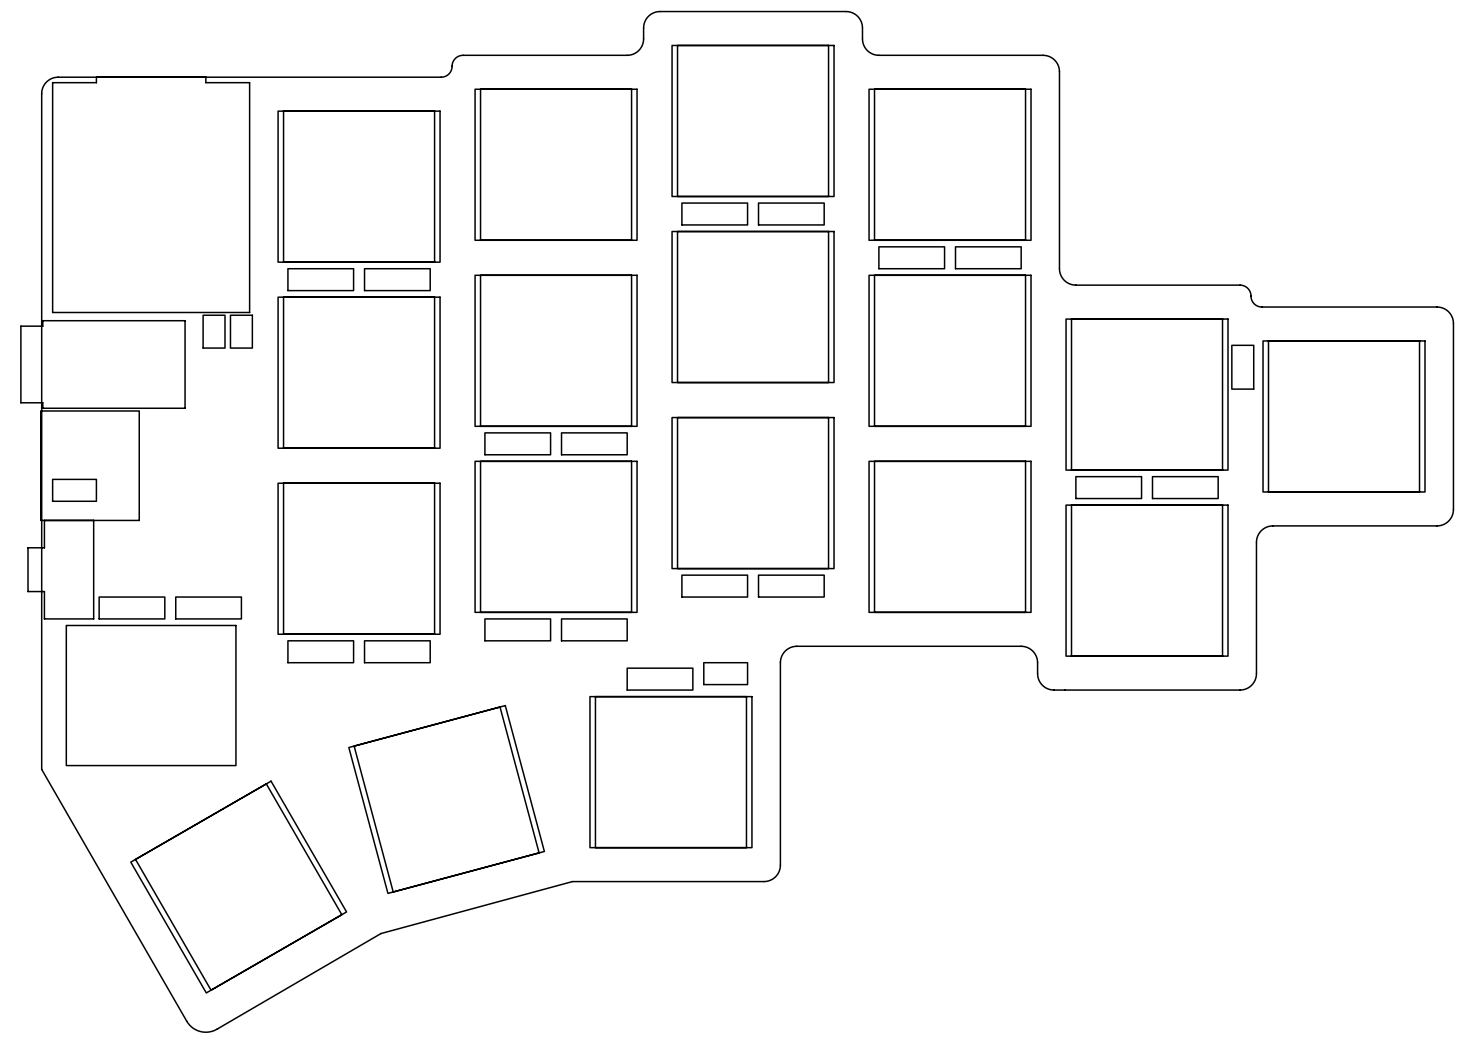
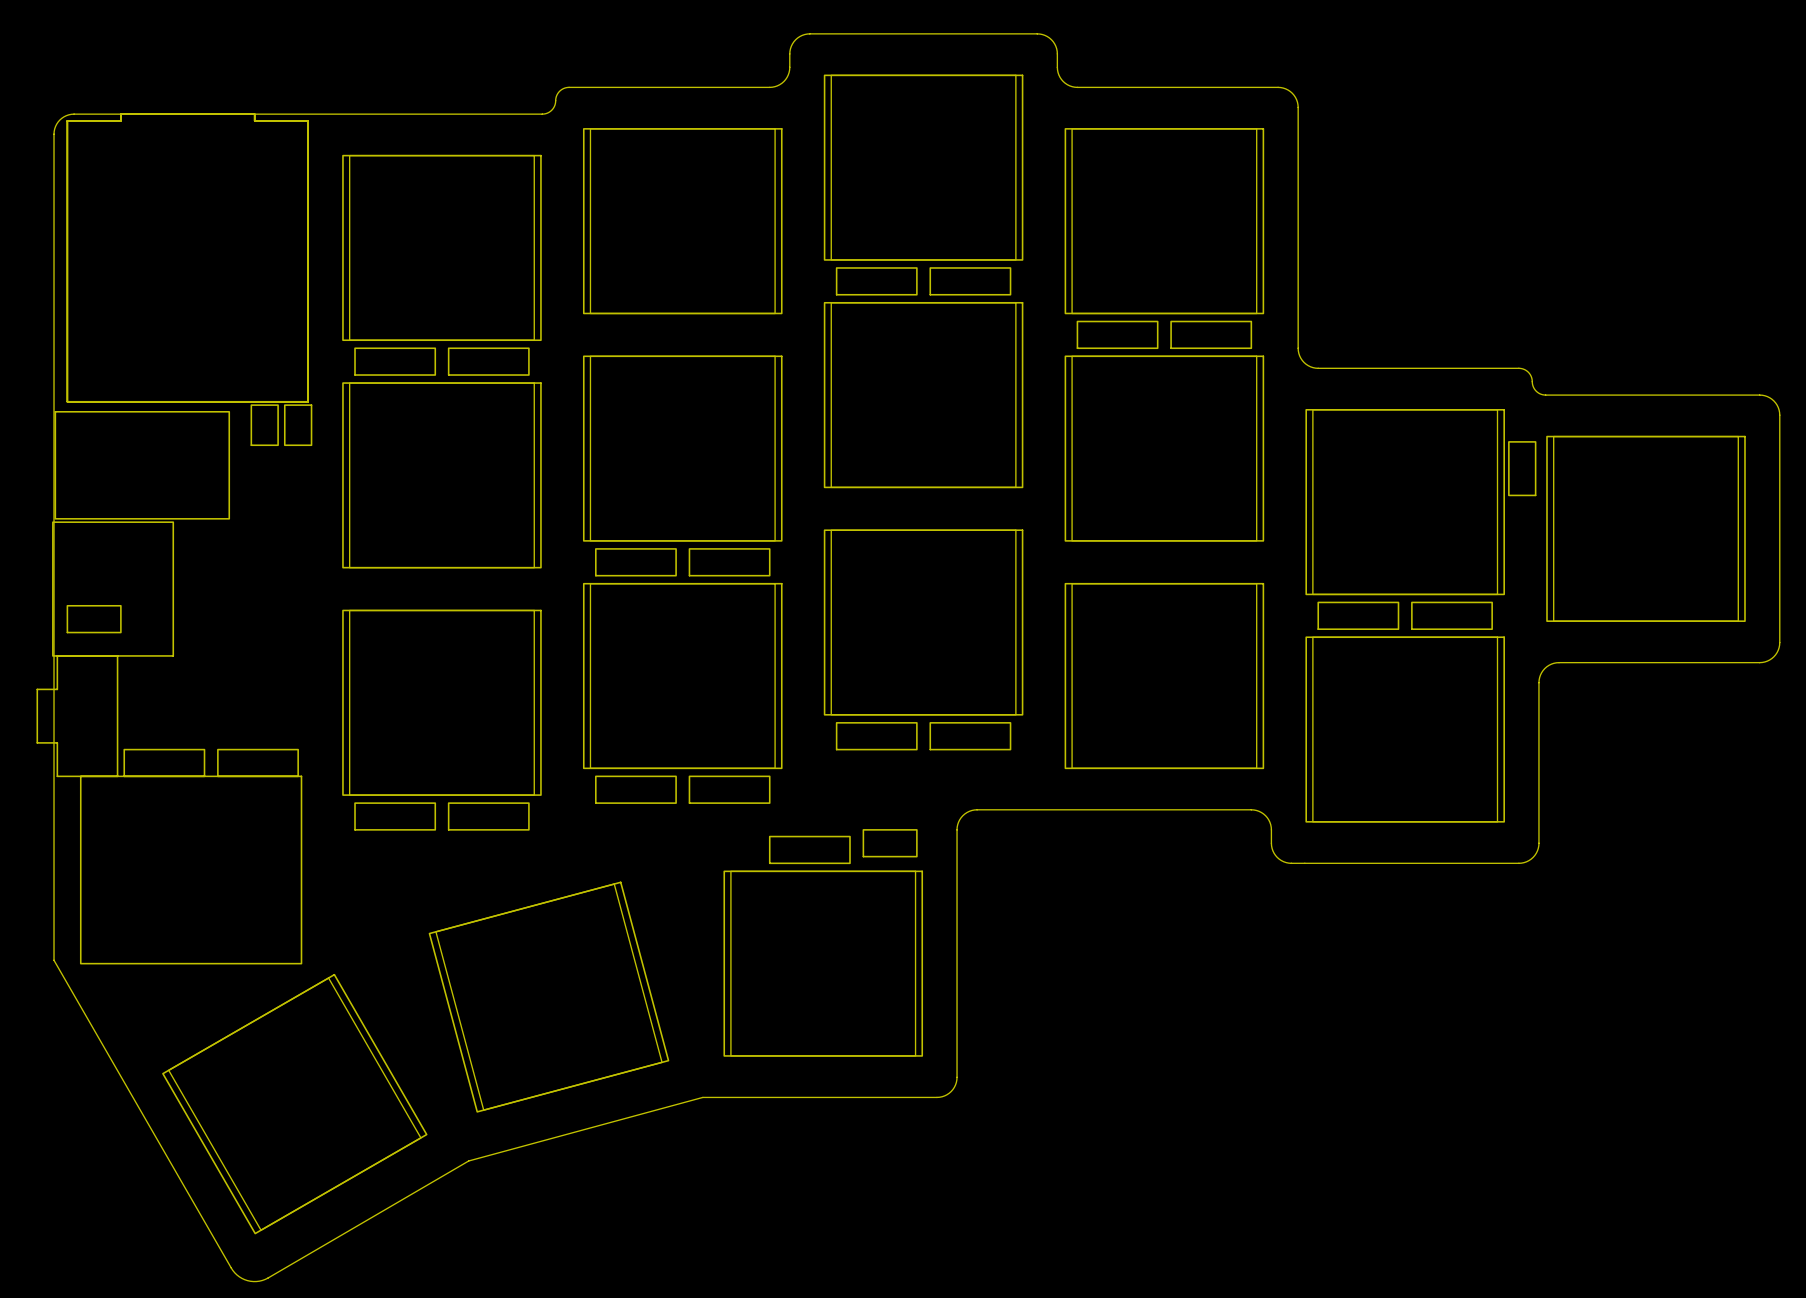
drawing: [51, 76, 251, 314] -> none
drawing: none -> [66, 113, 309, 403]
drawing shape: [20, 320, 186, 409] -> [54, 411, 231, 520]
drawing shape: [65, 624, 237, 767] -> [79, 775, 303, 965]

